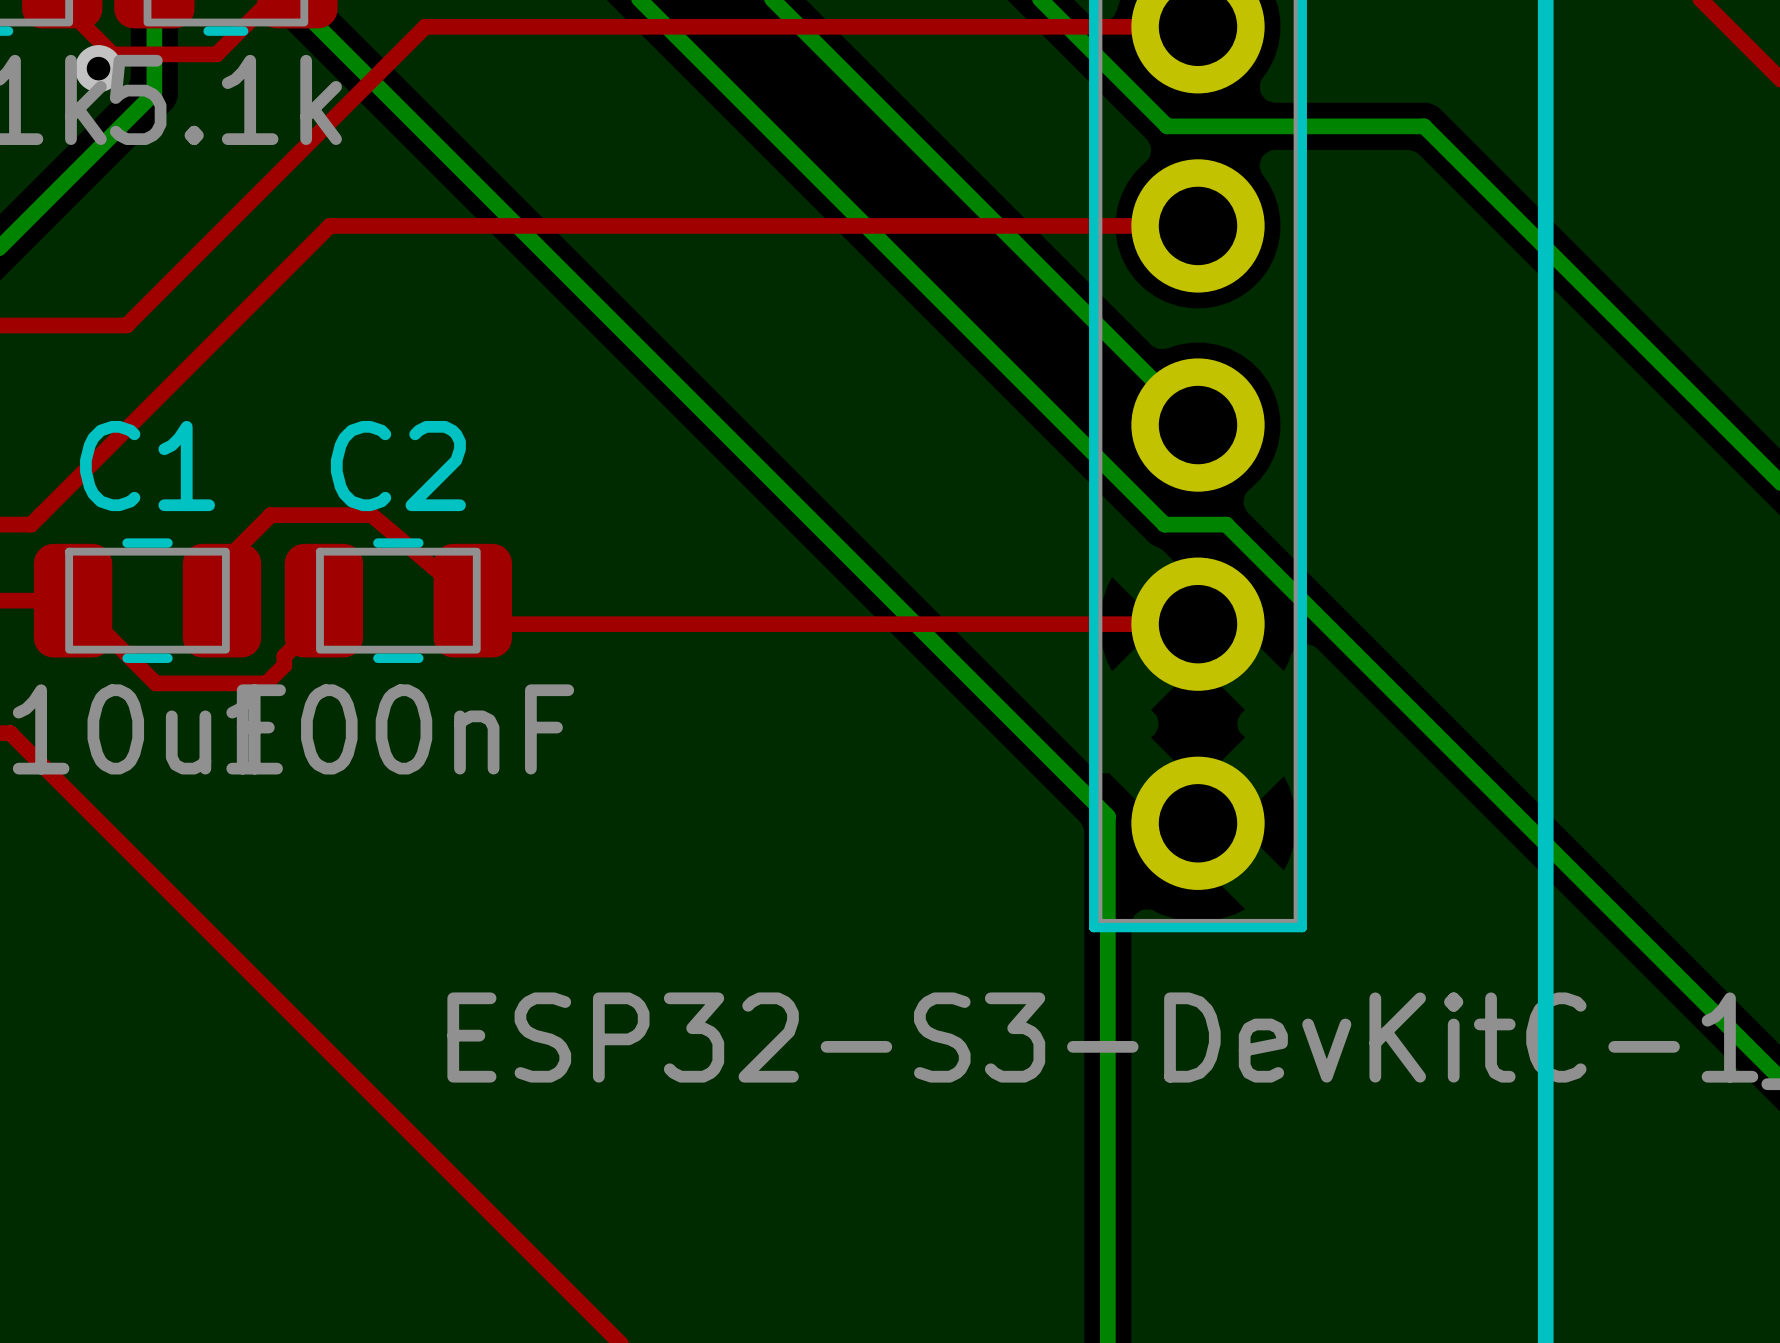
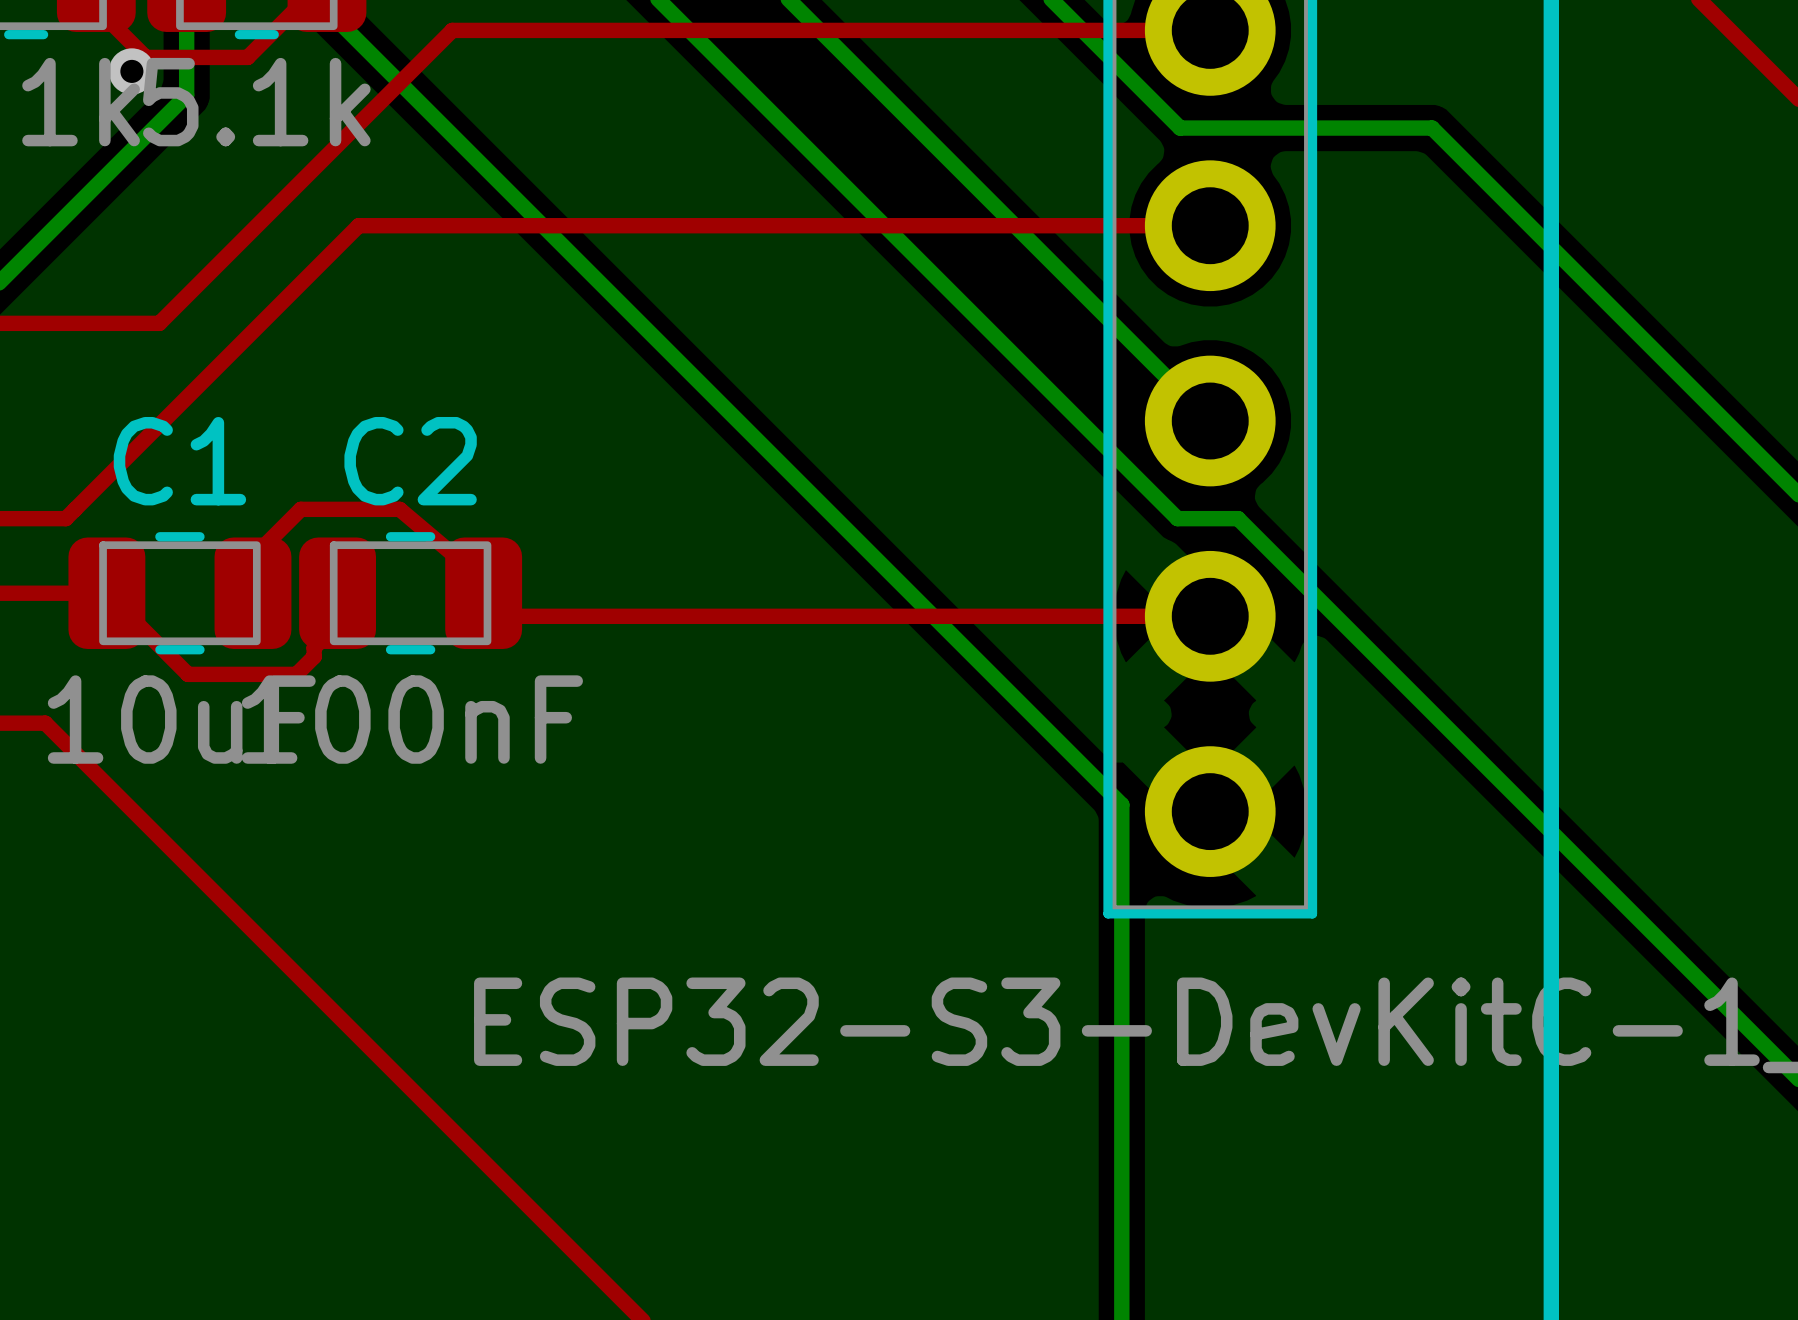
C2 position: (398, 600) -> (410, 593)

